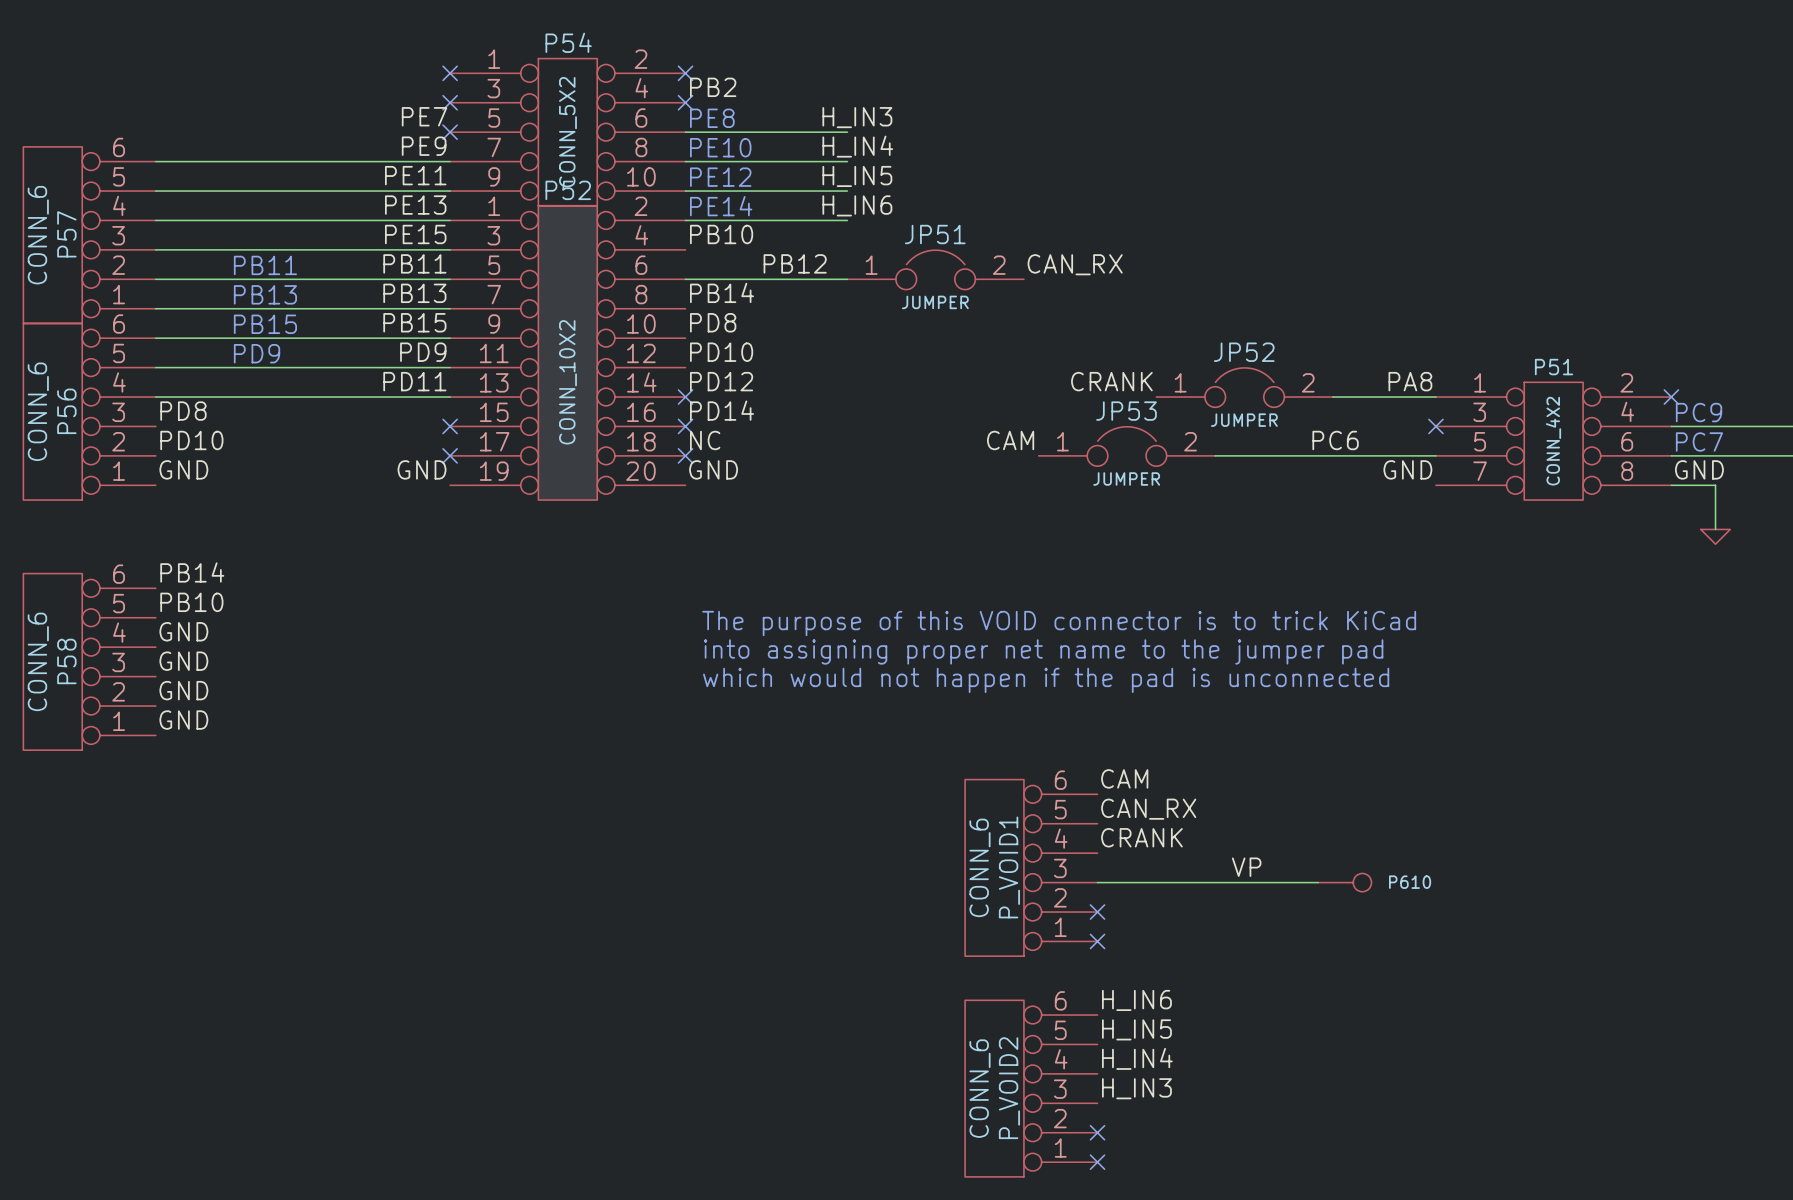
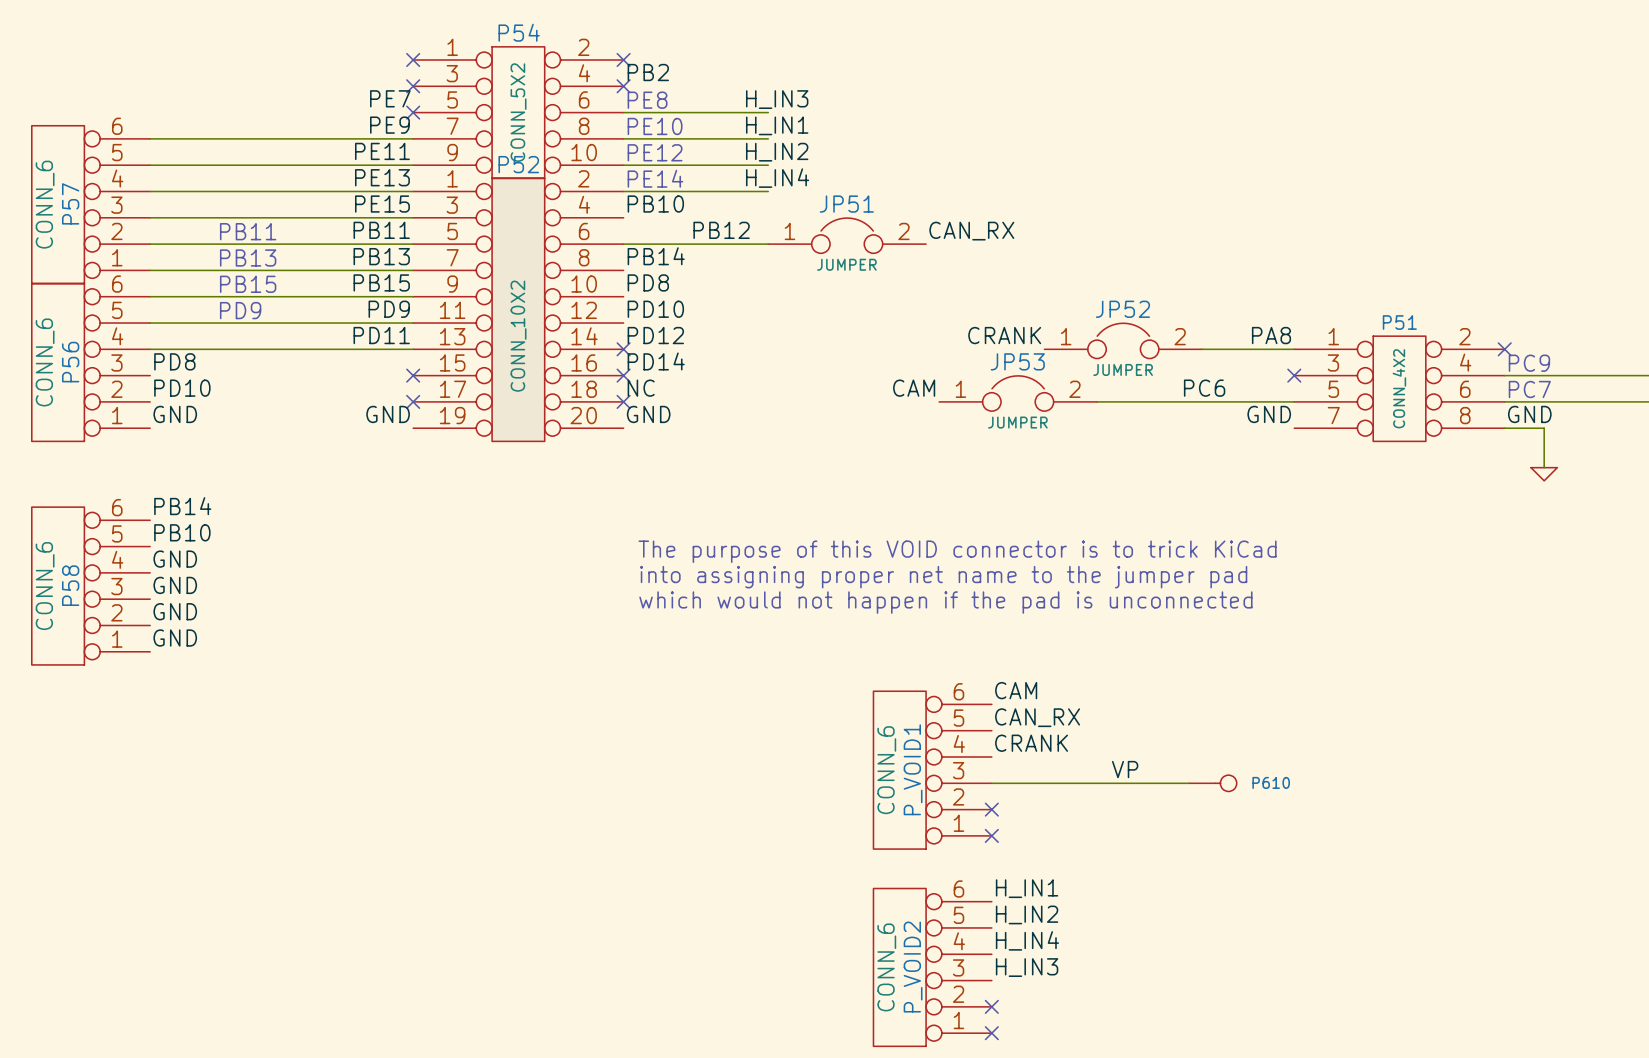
label: H_IN4 (857, 146) -> H_IN1 (777, 125)
label: H_IN5 (857, 176) -> H_IN2 (777, 152)
label: H_IN6 (857, 205) -> H_IN4 (777, 178)
label: H_IN6 (1136, 1000) -> H_IN1 (1027, 888)
label: H_IN5 (1136, 1029) -> H_IN2 (1027, 914)

